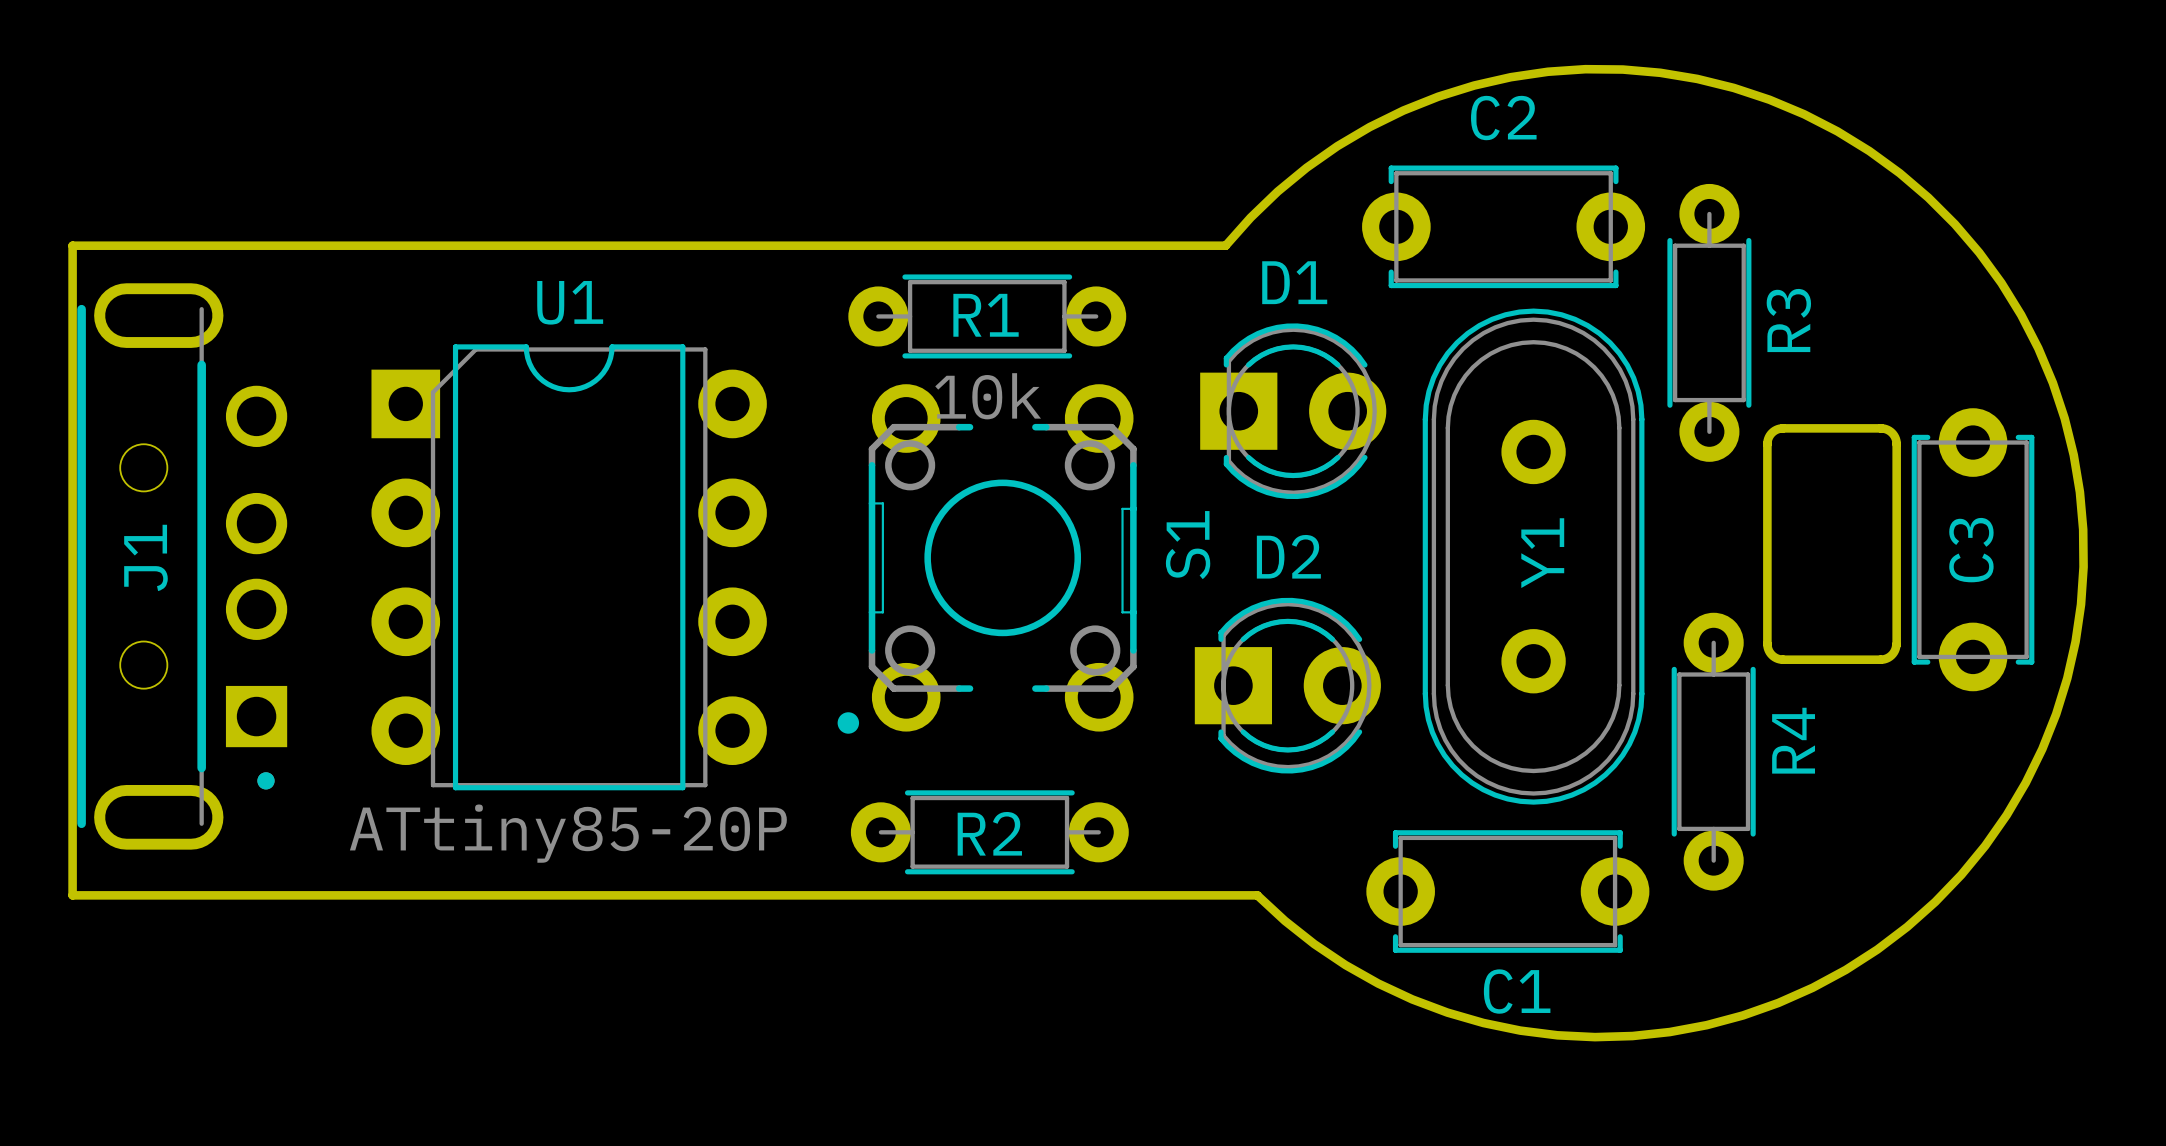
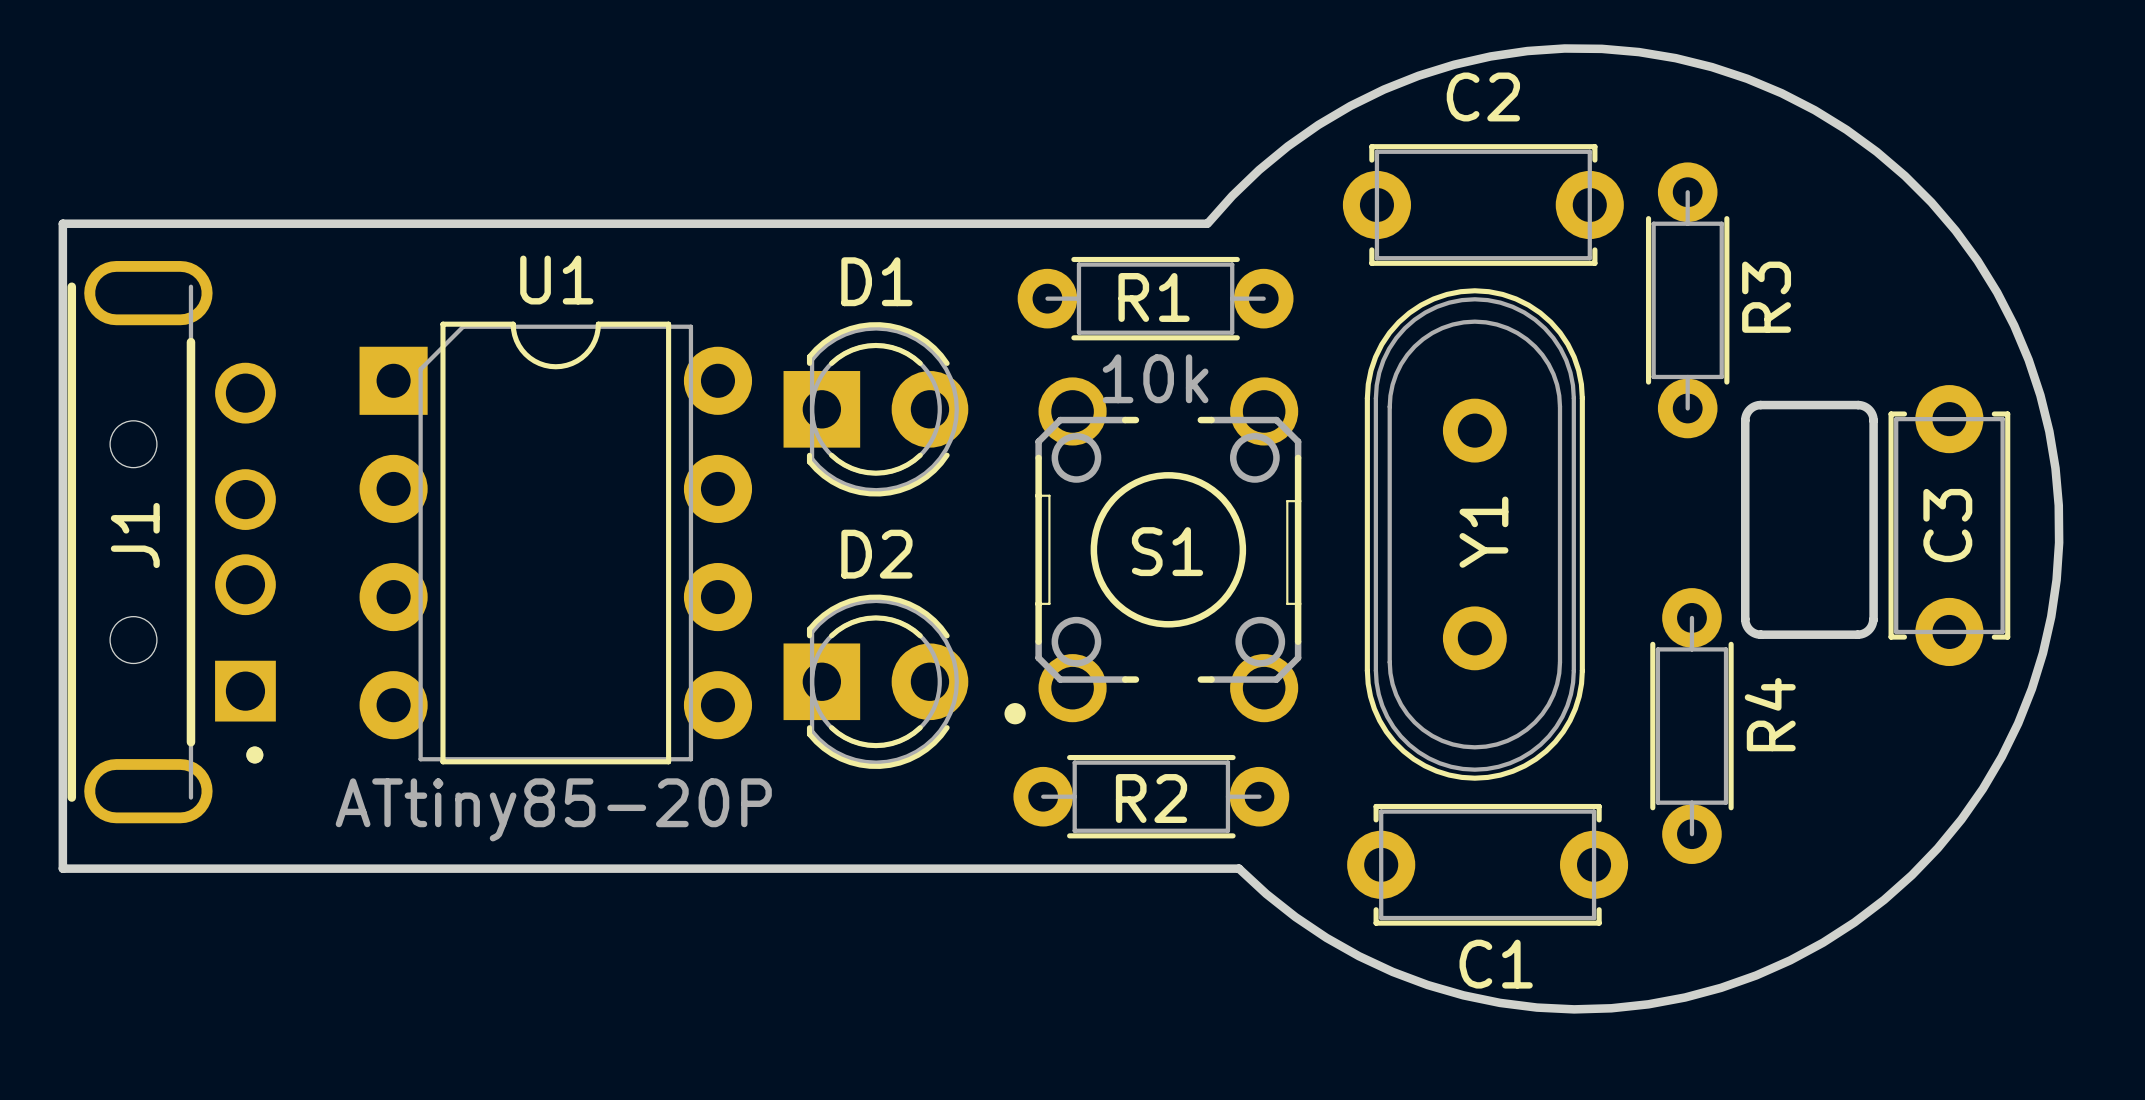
R1 position: (987, 316) -> (1155, 298)
D1 position: (1293, 411) -> (875, 409)
S1 name rotation: 0° (1188, 545) -> 90° clockwise (1167, 551)
Y1 position: (1533, 556) -> (1474, 534)
S1 position: (987, 558) -> (1152, 550)
D2 position: (1287, 685) -> (875, 681)
R2 position: (989, 832) -> (1151, 796)

